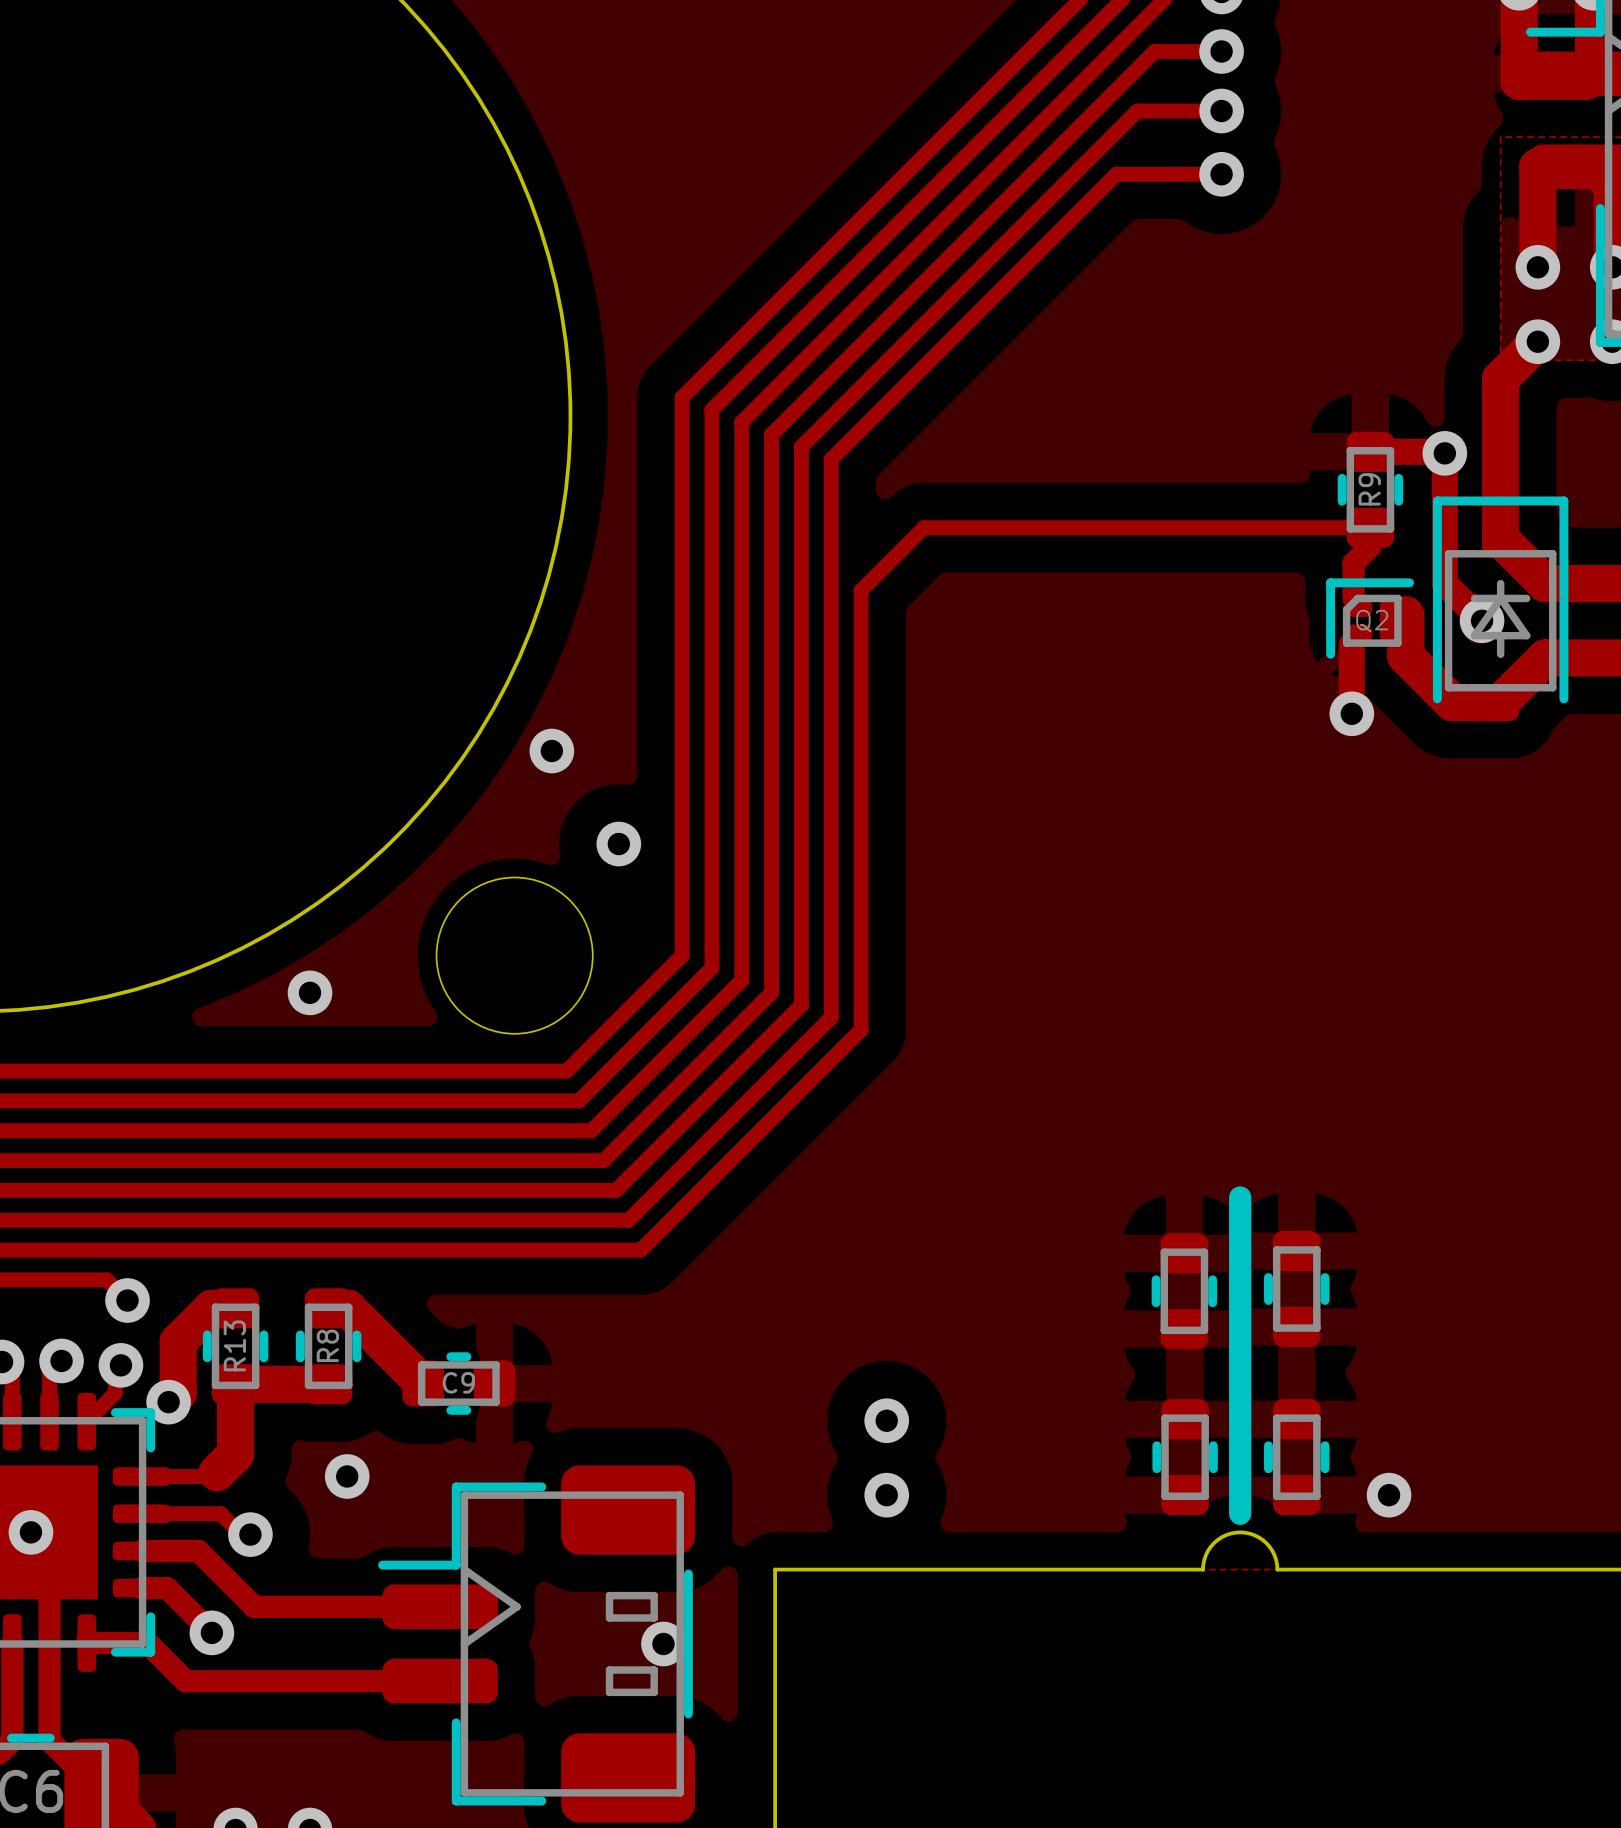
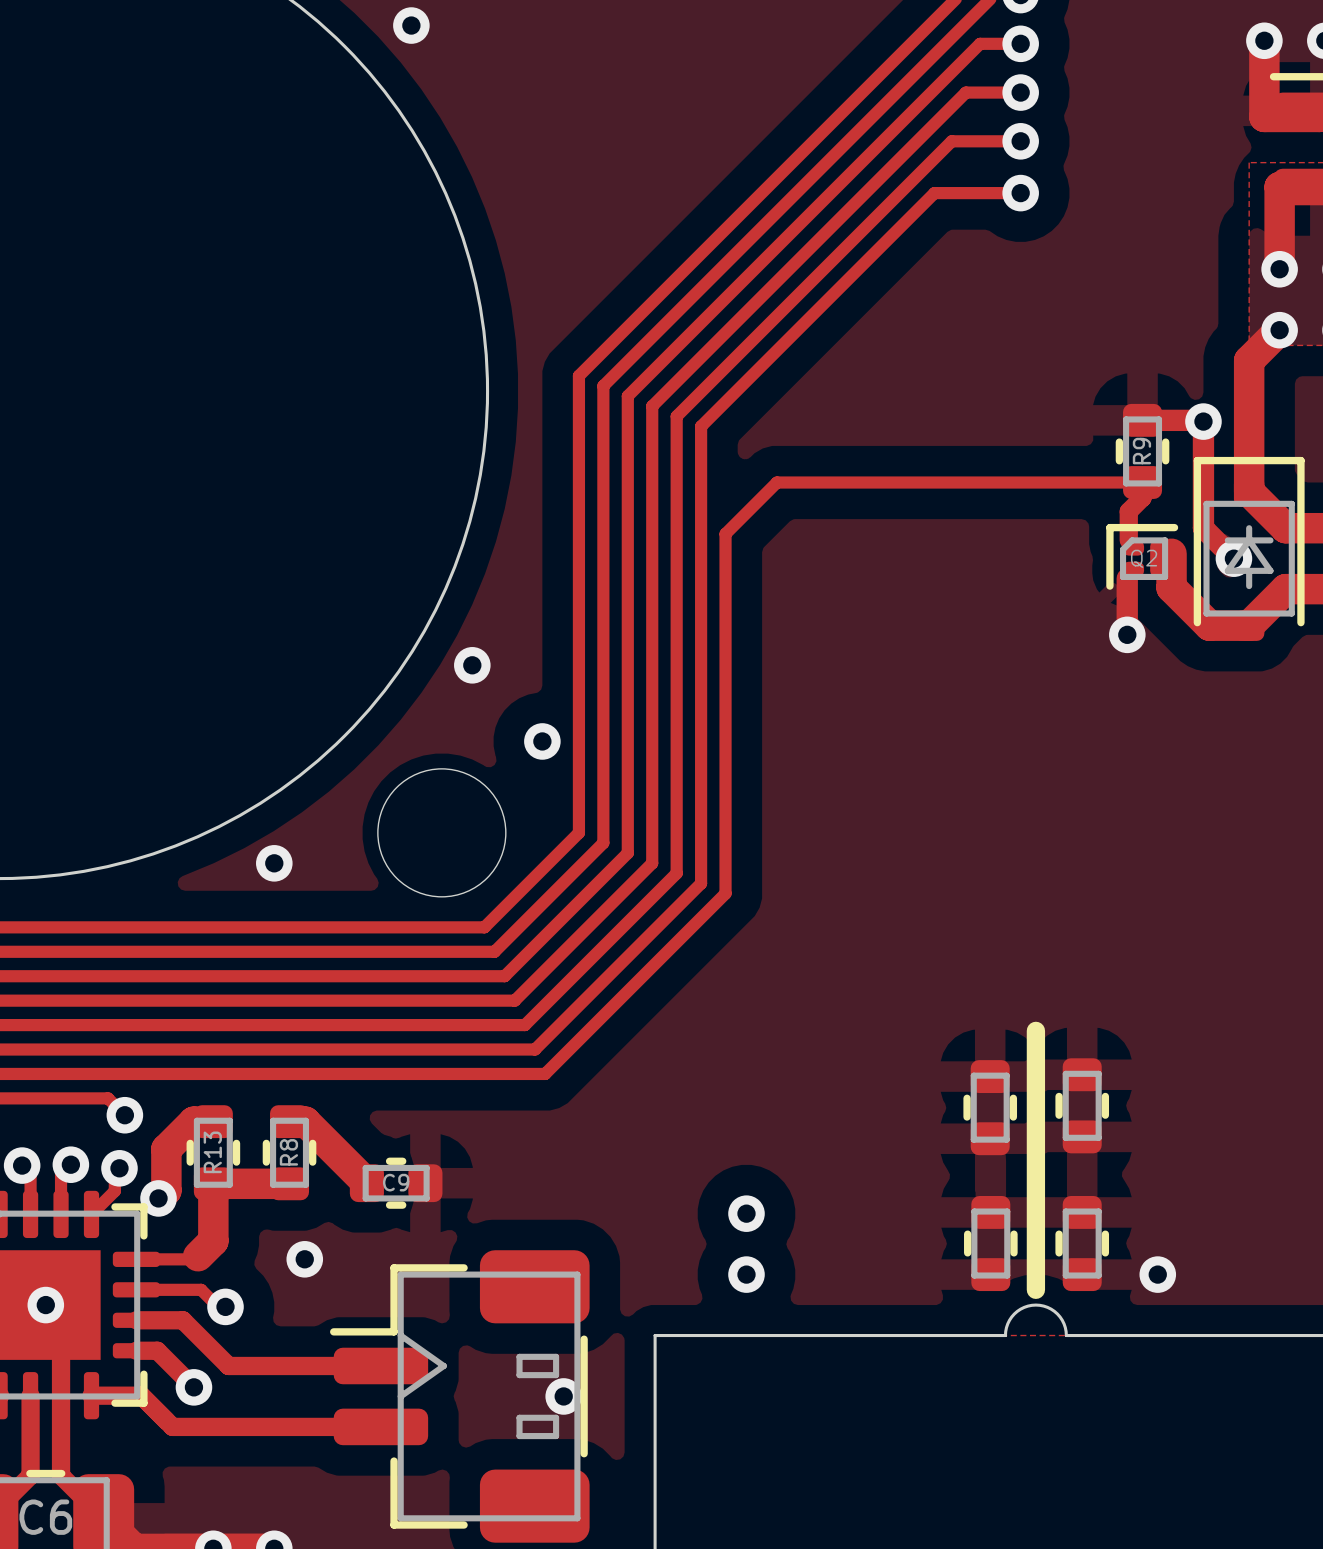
via position: (618, 844) -> (542, 741)

